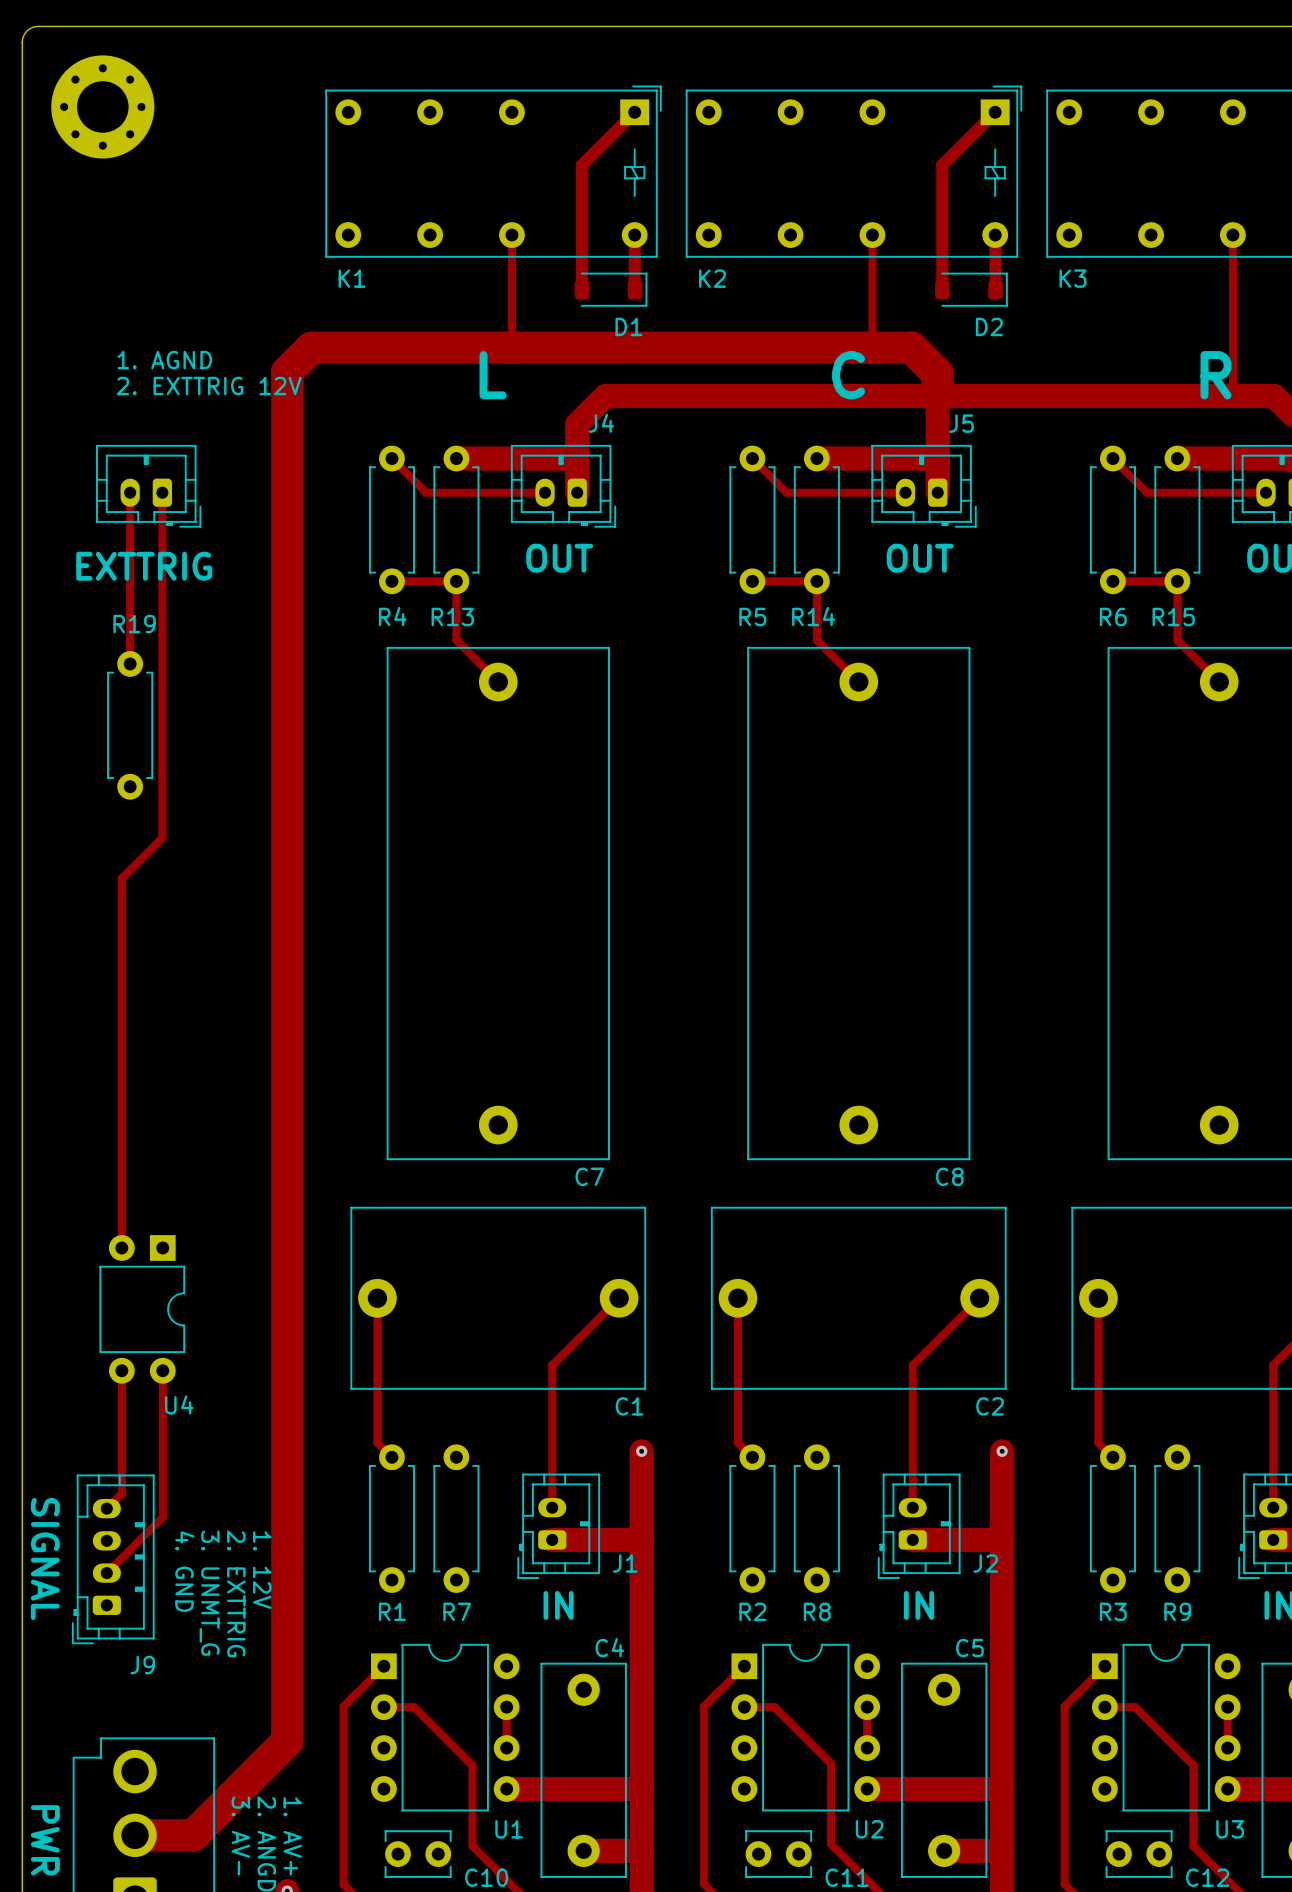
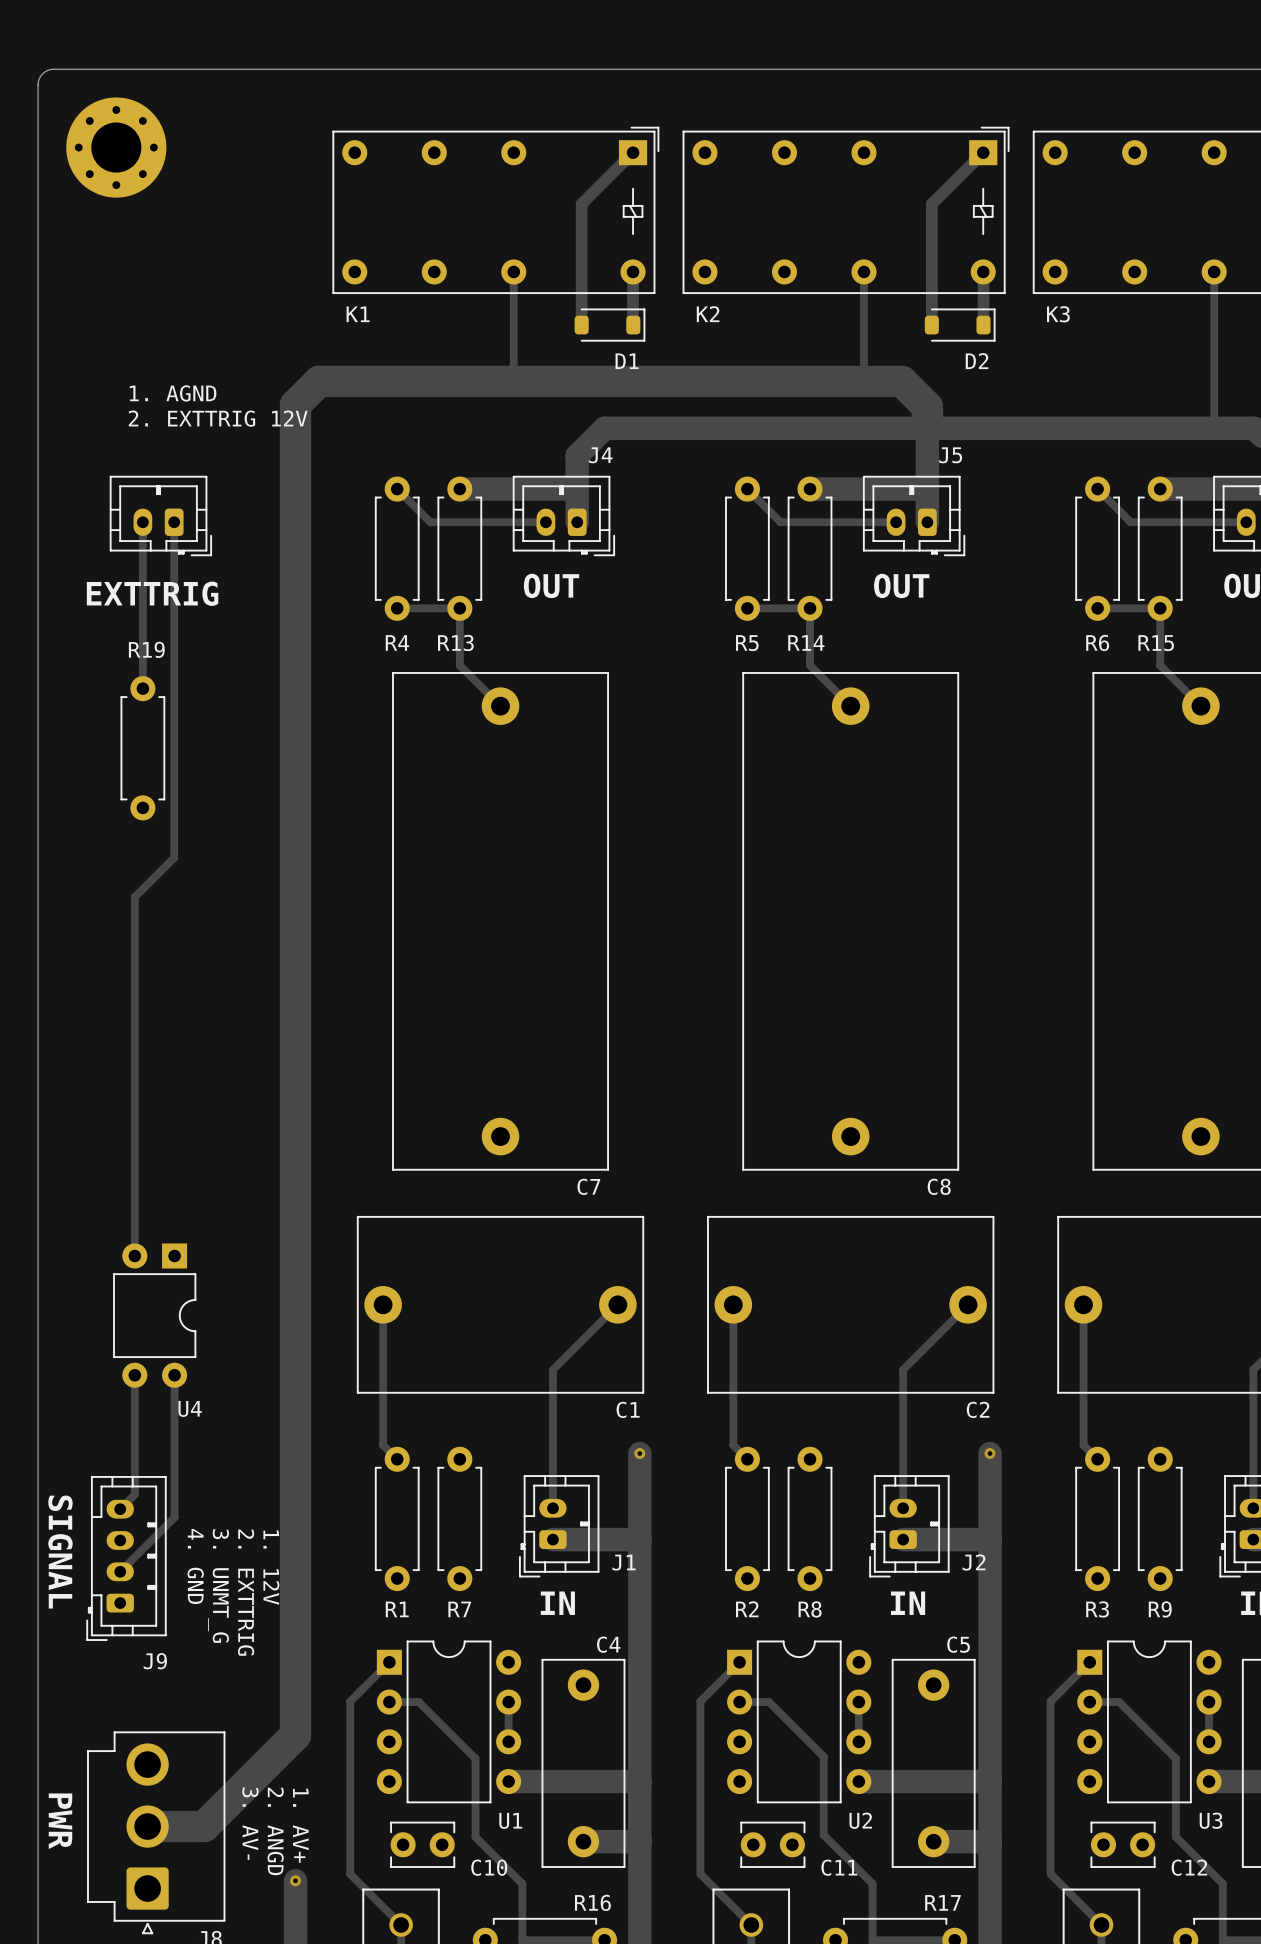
text: L (493, 375) -> none
text: C (848, 375) -> none
text: R (1216, 375) -> none

